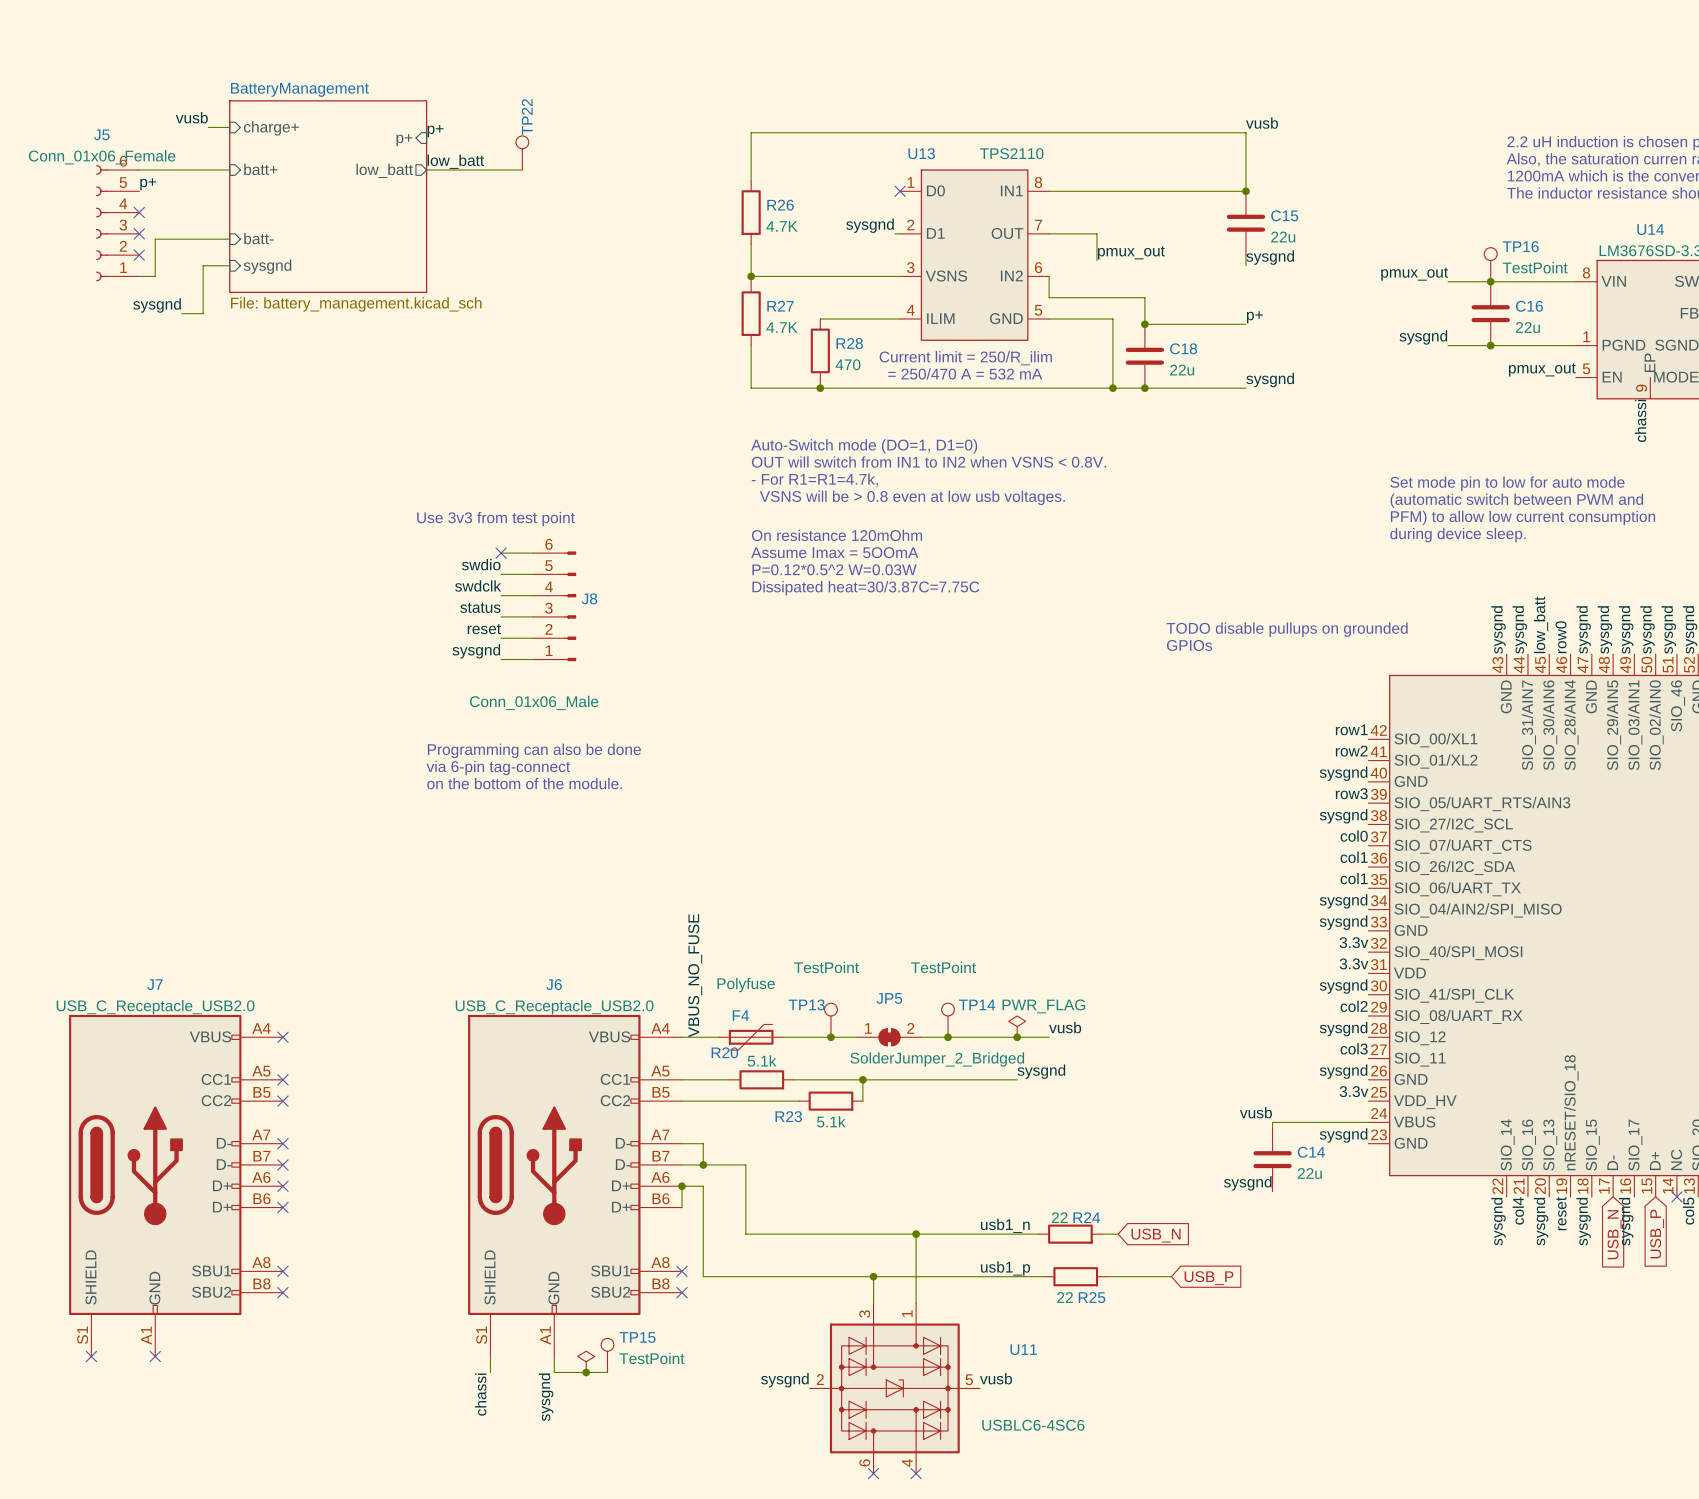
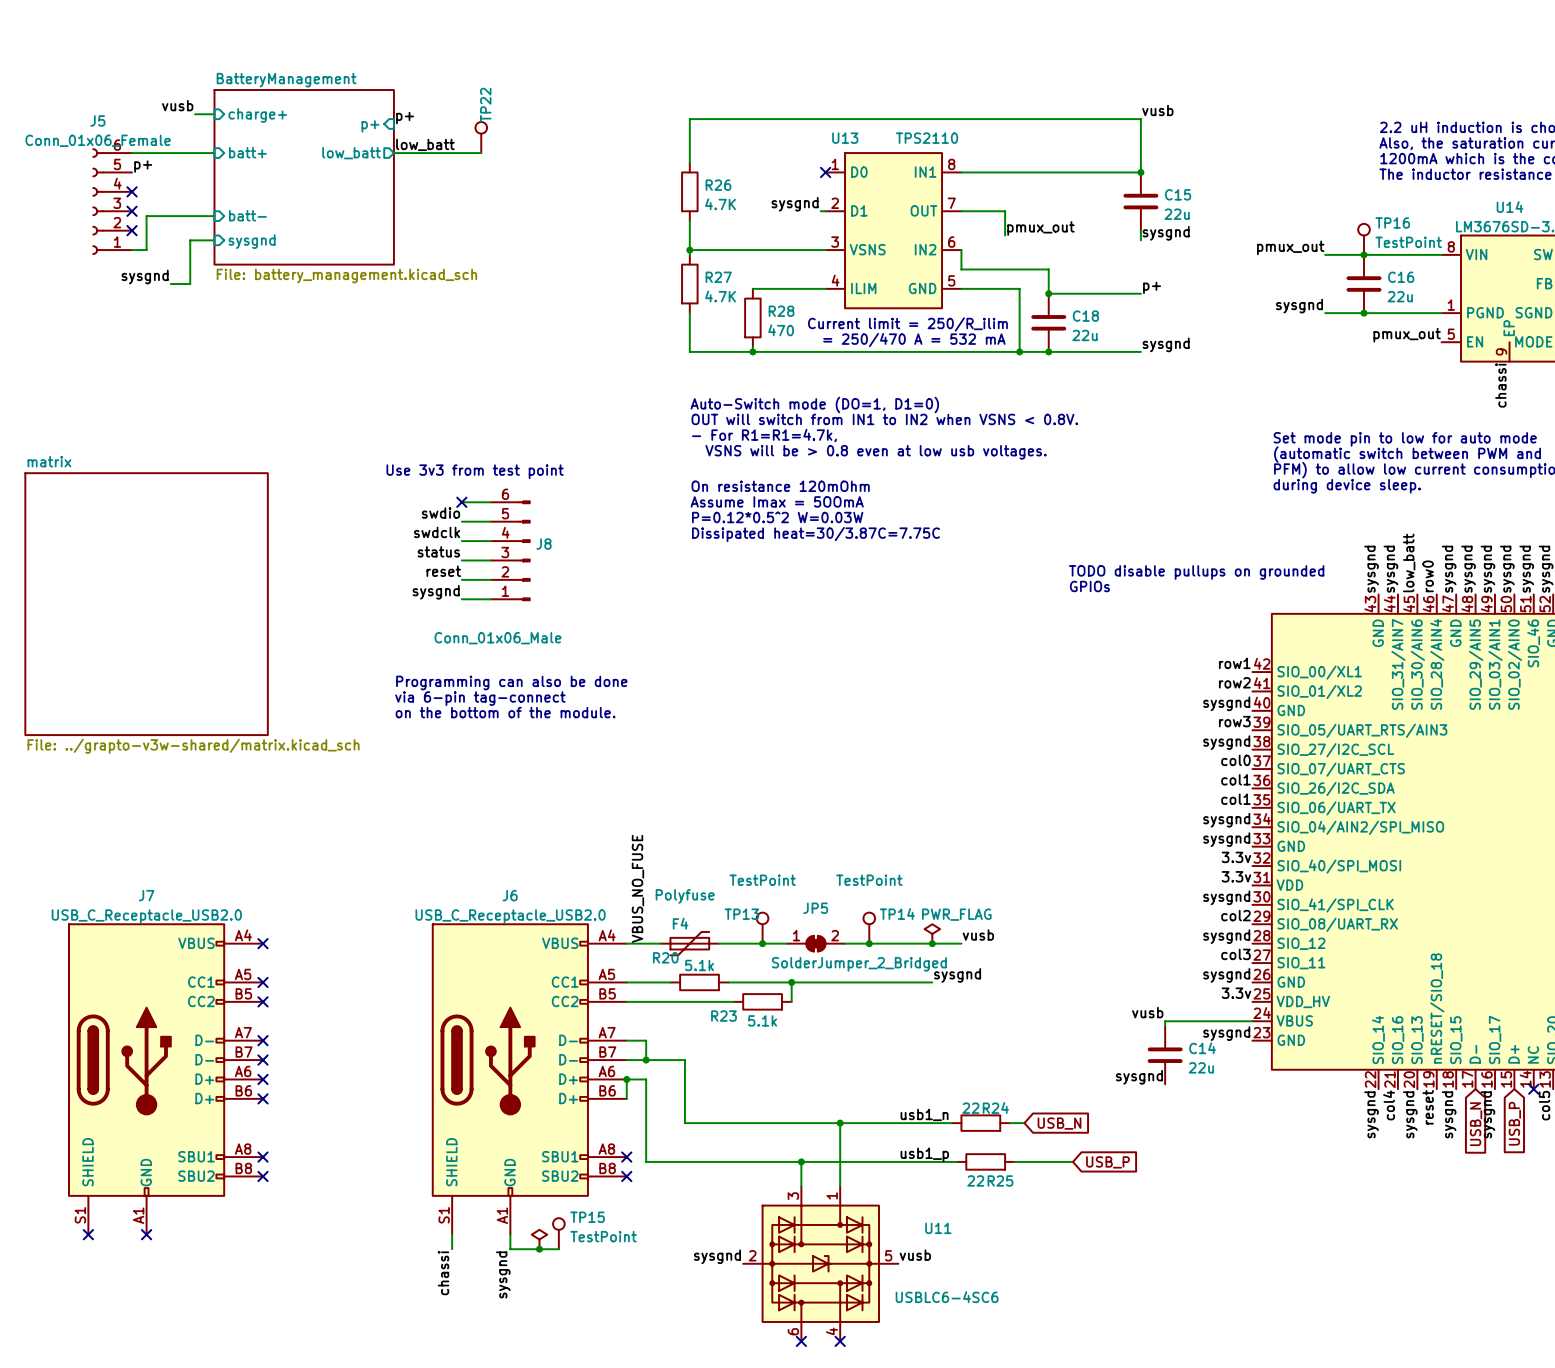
sheet matrix: none -> File: ../grapto-v3w-shared/matrix.kicad_sch (146, 604)

